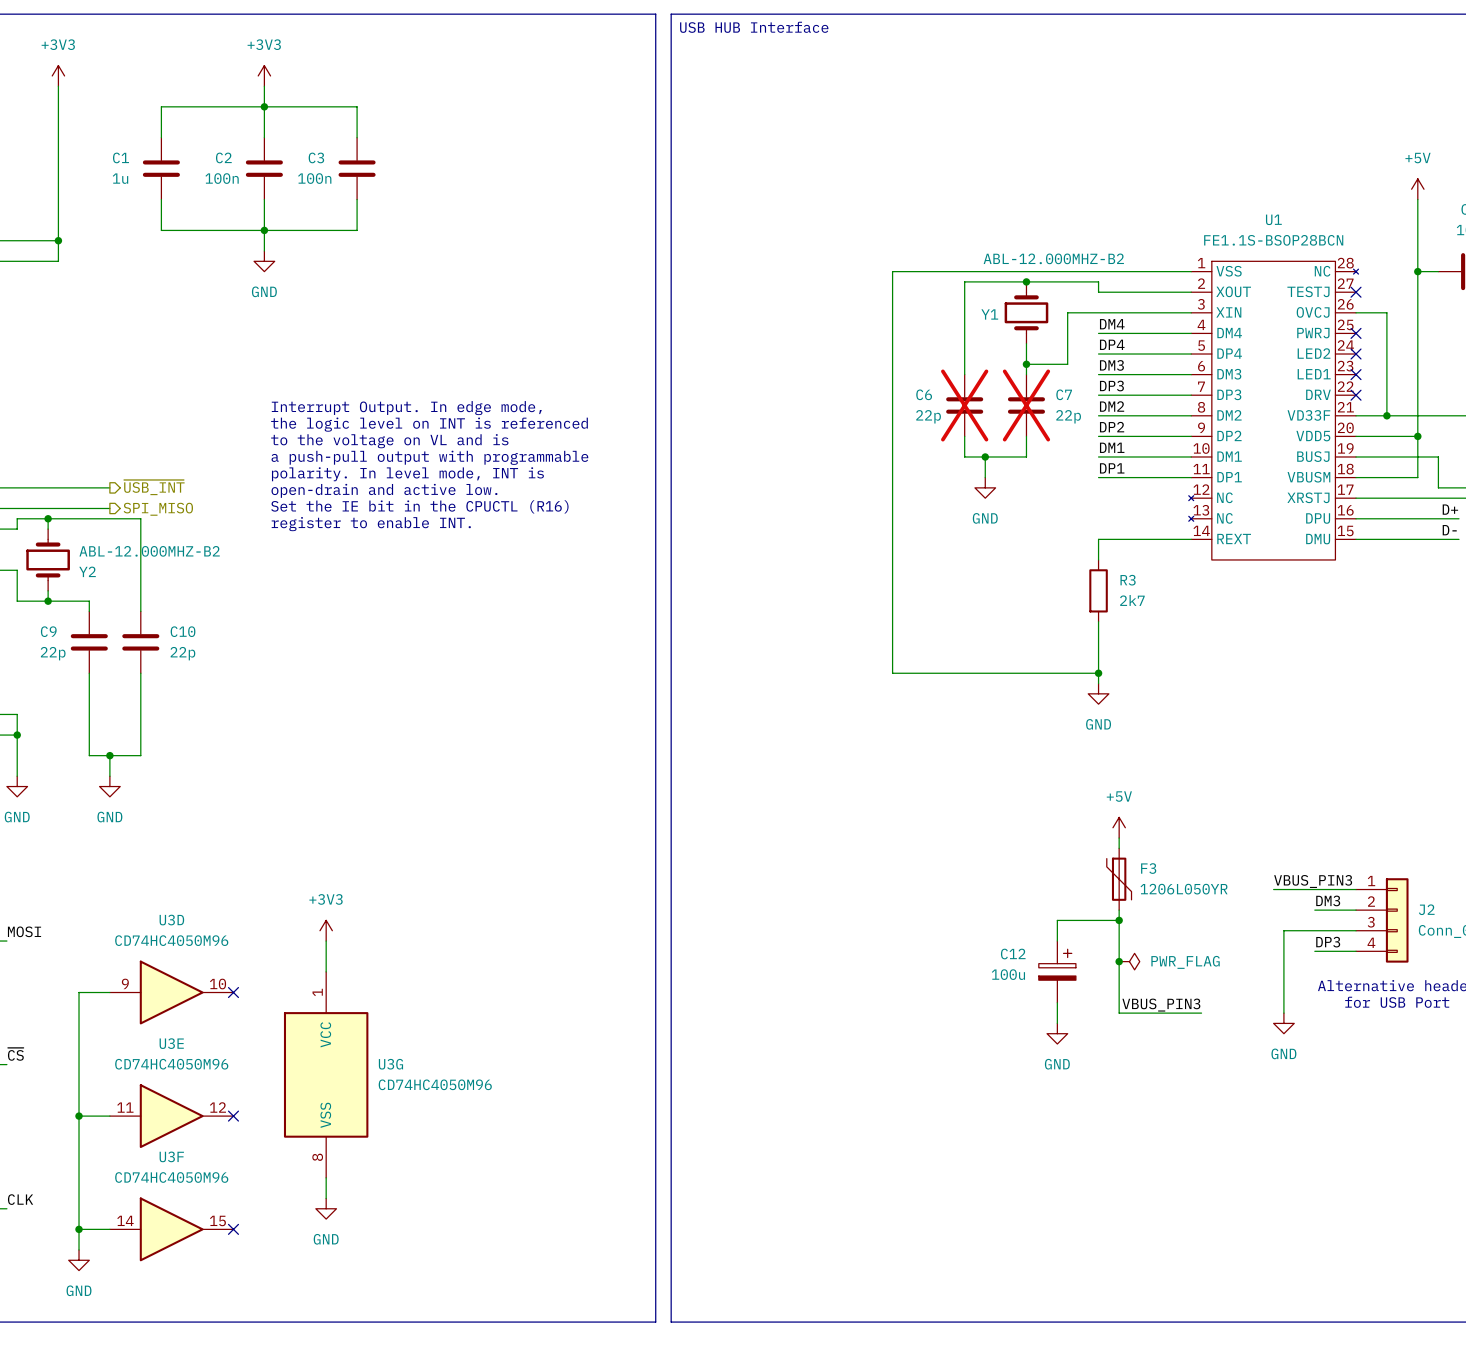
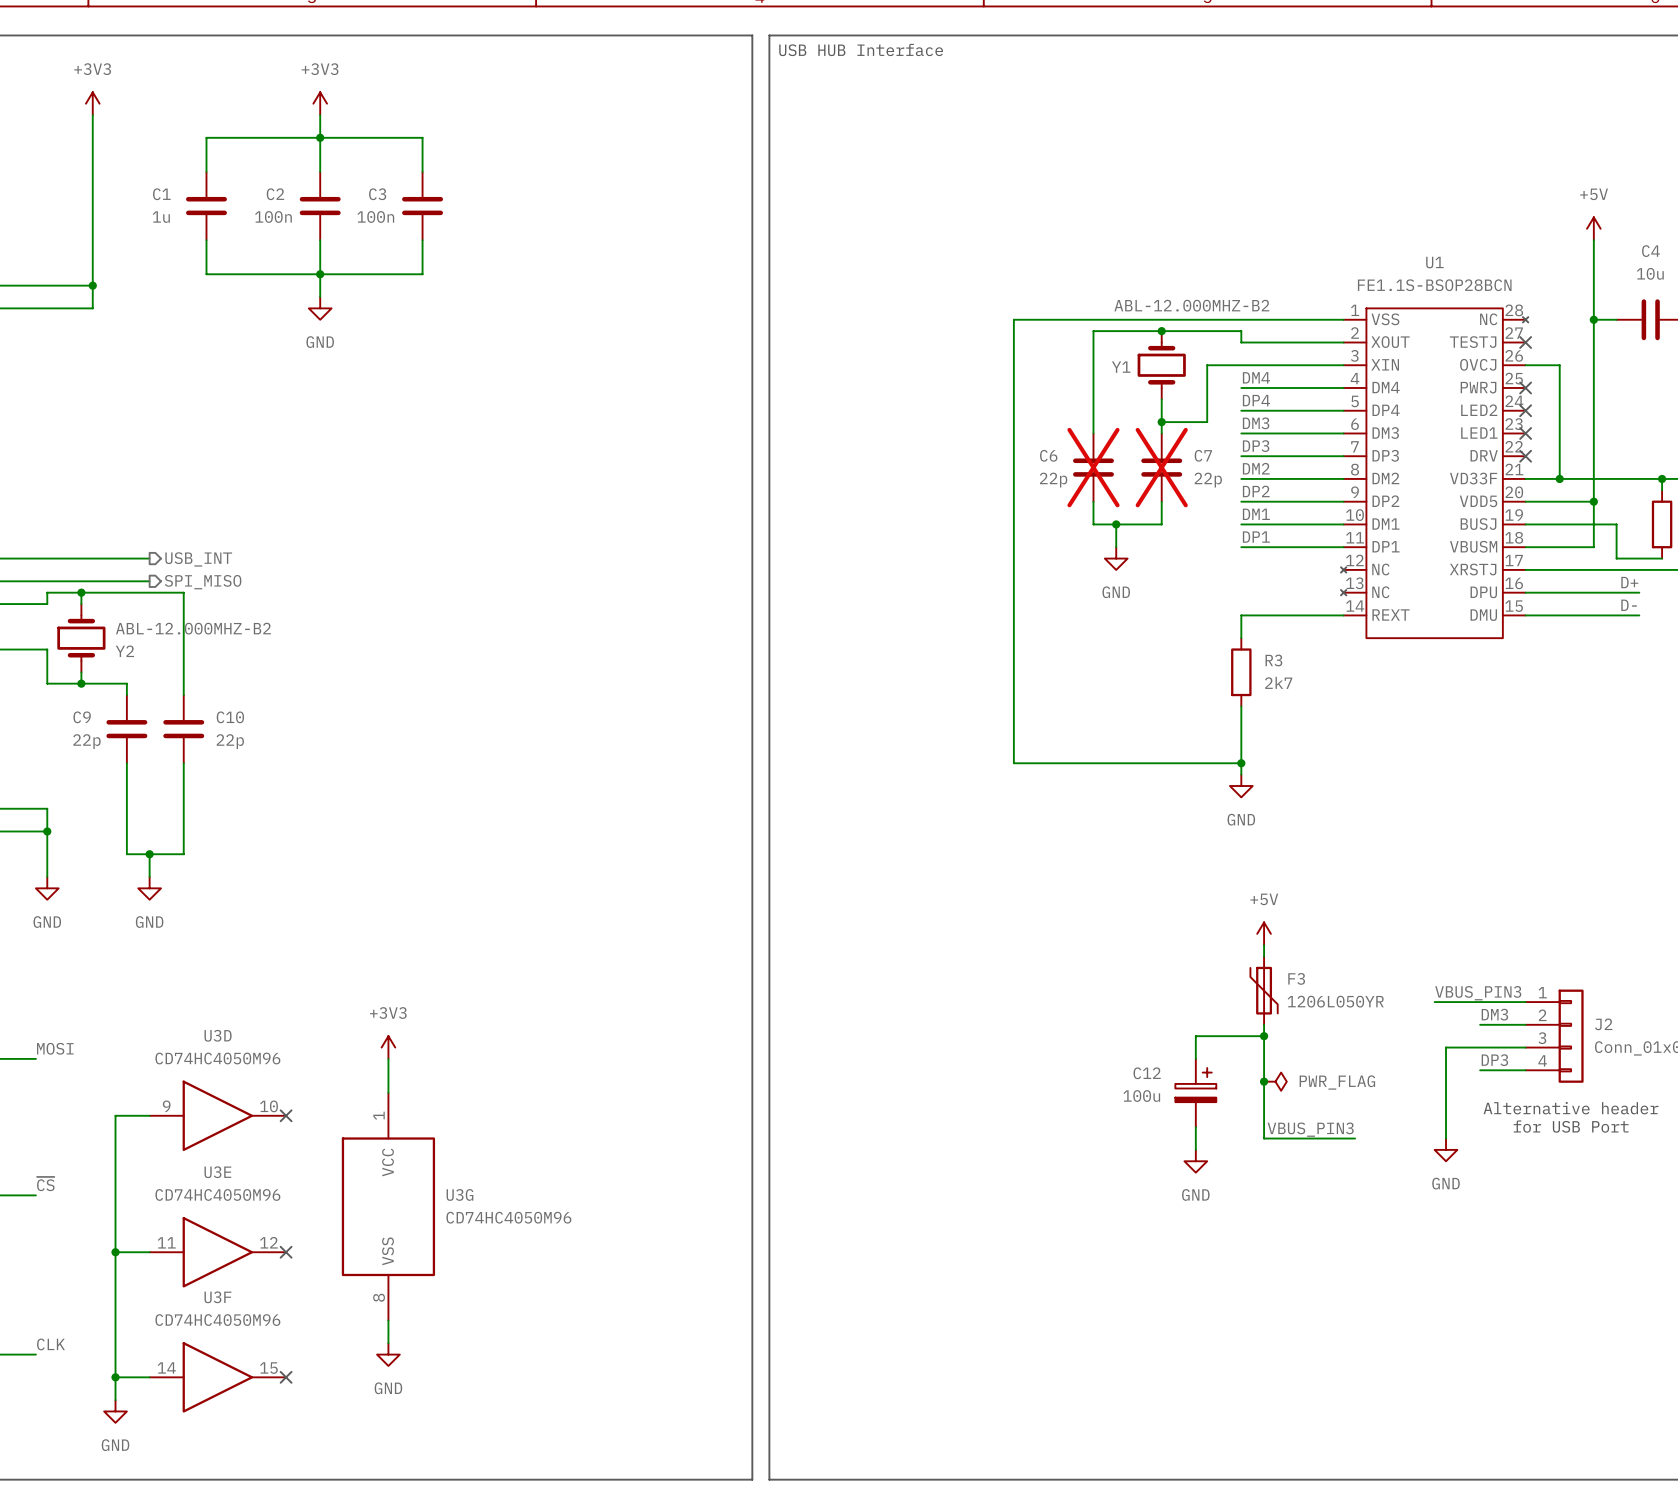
text: Interrupt Output. In edge mode, (406, 408) -> none
text: the logic level on INT is referenced (429, 424) -> none
text: to the voltage on VL and is (389, 441) -> none
text: a push-pull output with programmable (429, 457) -> none
text: polarity. In level mode, INT is (407, 474) -> none
hierarchical label: ~{USB_INT} (154, 487) -> USB_INT (198, 559)
text: open-drain and active low. (384, 490) -> none
text: Set the IE bit in the CPUCTL (R16) (419, 506) -> none
text: register to enable INT. (371, 524) -> none

